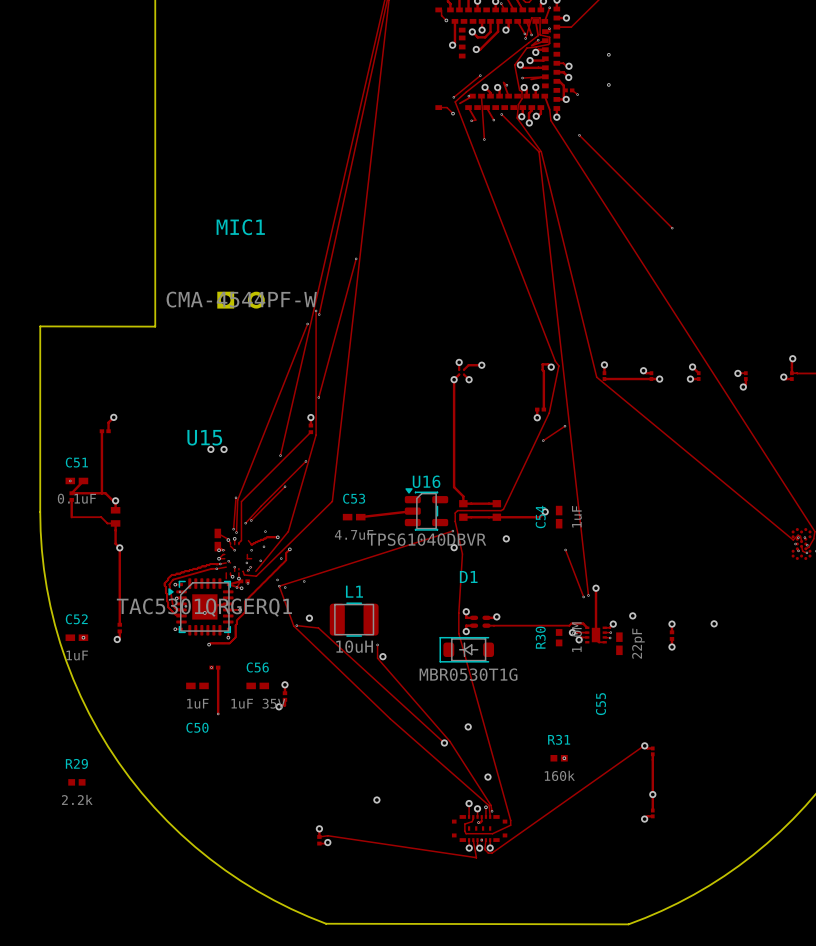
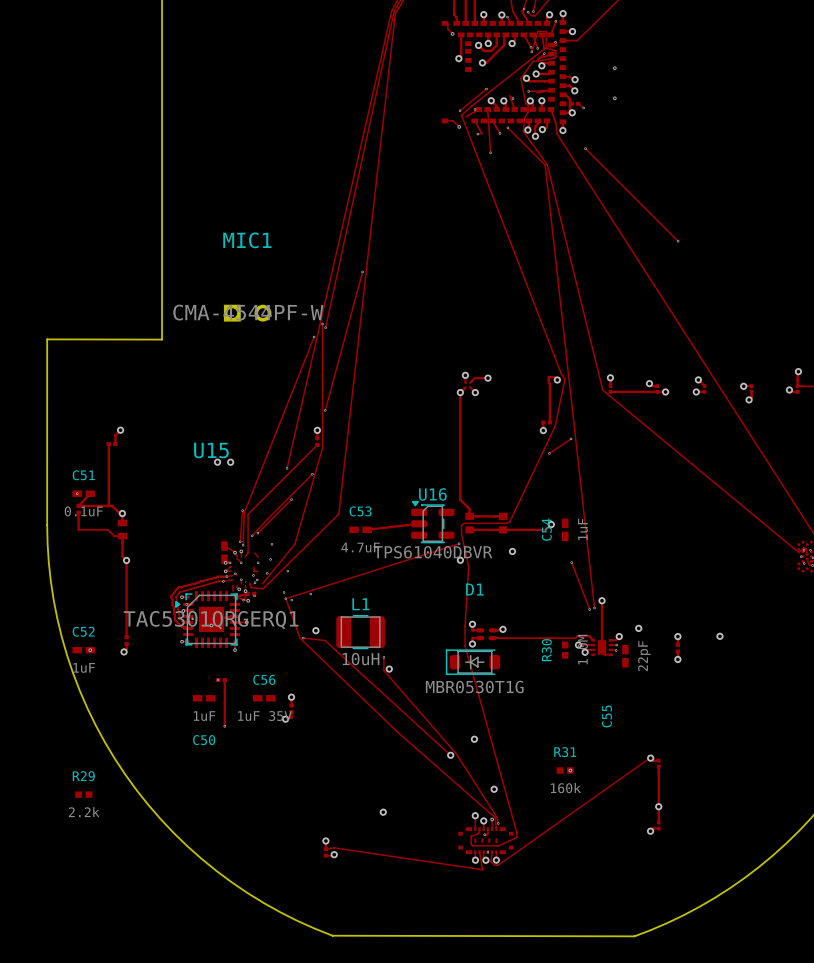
track: (277, 537) (266, 537) (251, 544) -> none
via: (277, 537) -> none
track: (289, 549) (286, 552) (286, 560) (245, 601) (245, 612) (236, 620) (235, 637) (229, 643) (209, 644) -> none
via: (289, 549) -> none
via: (209, 644) -> none

